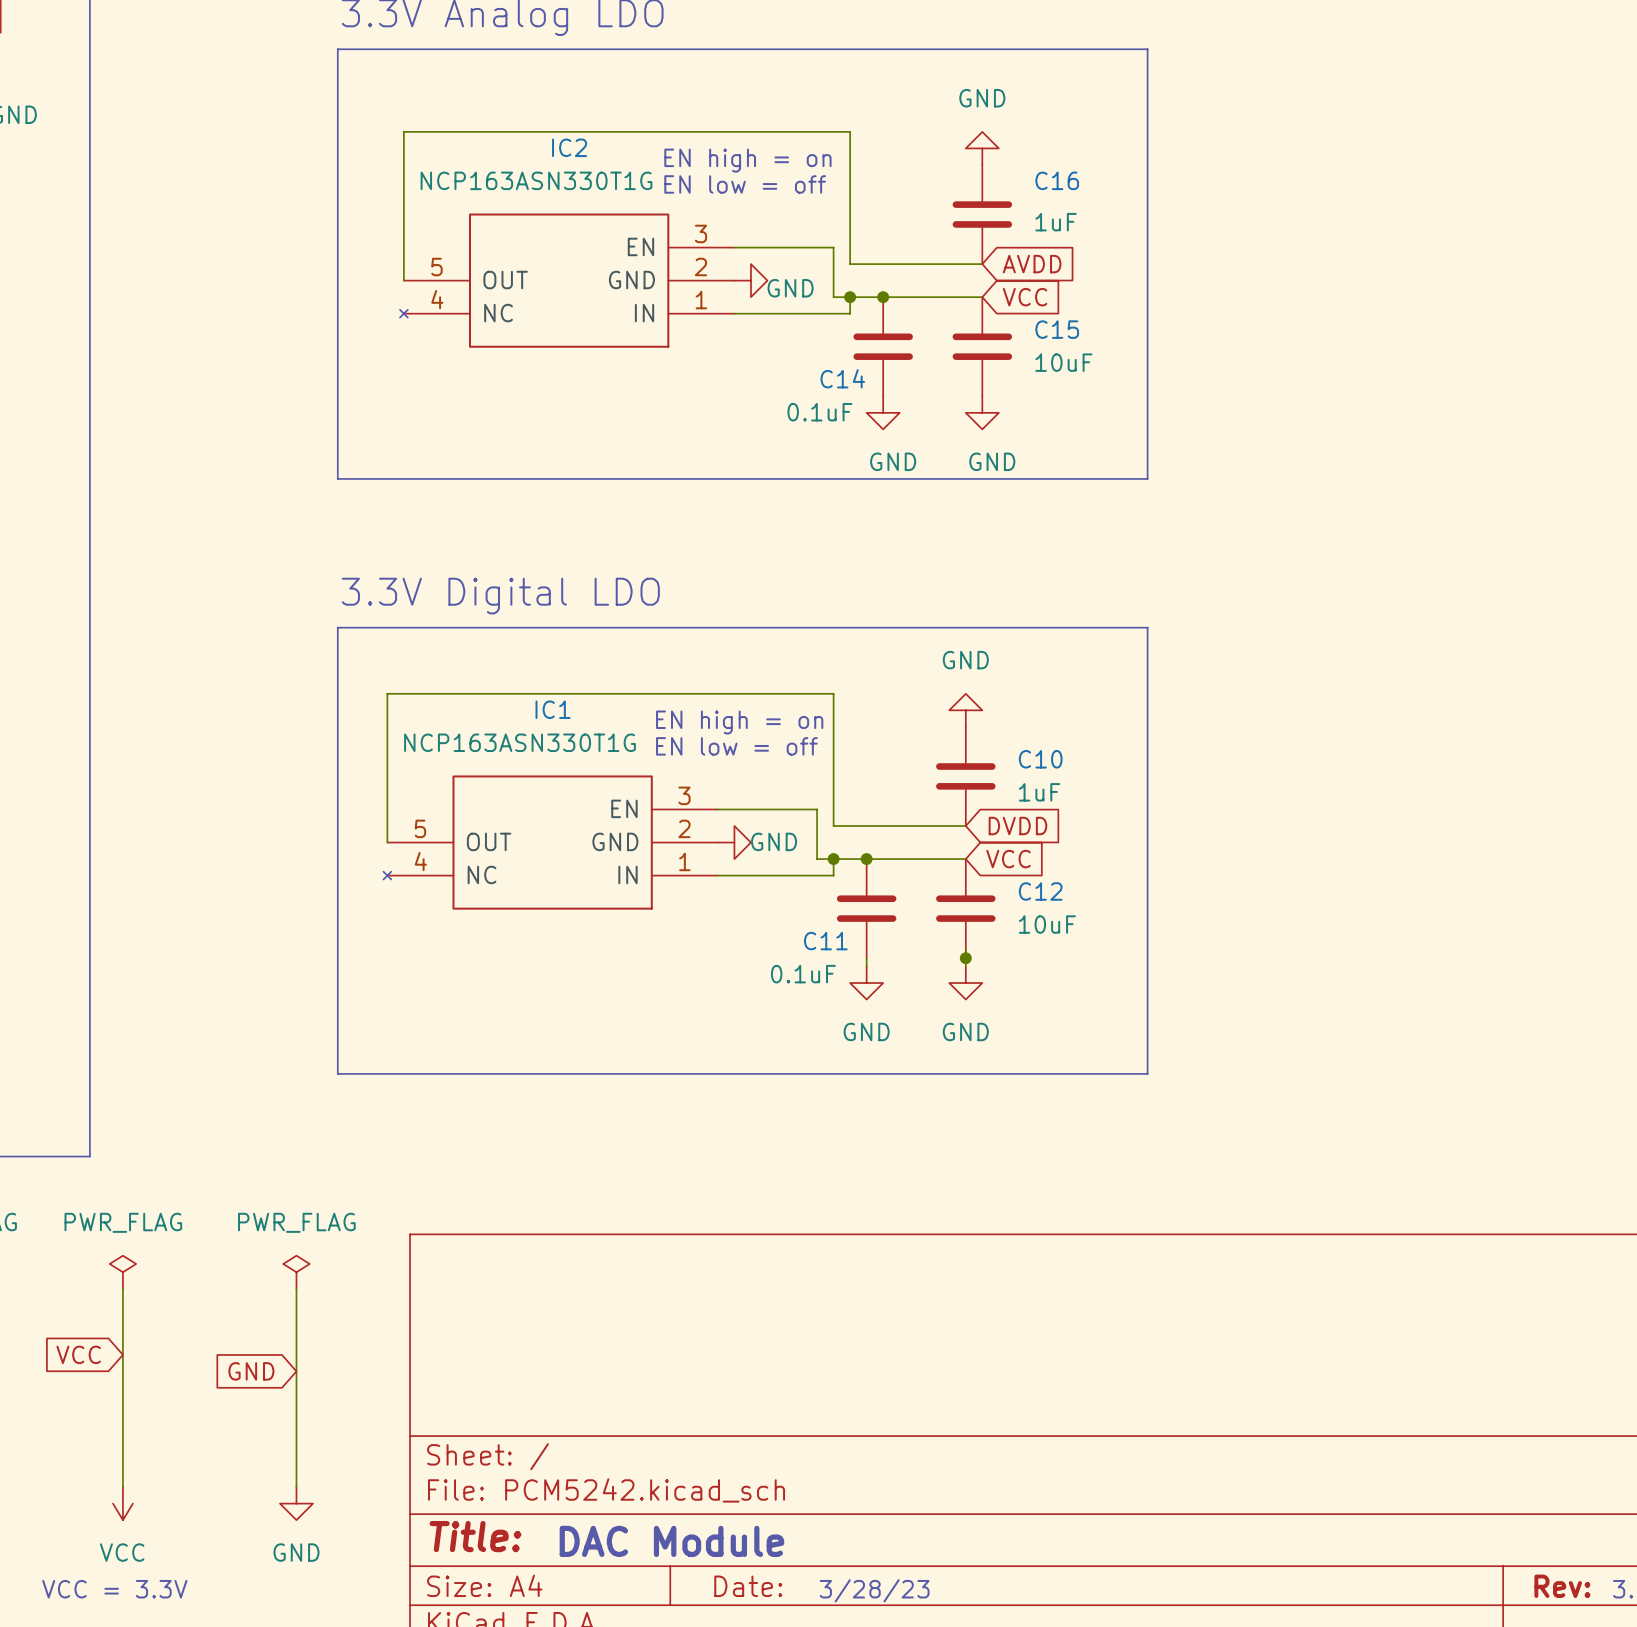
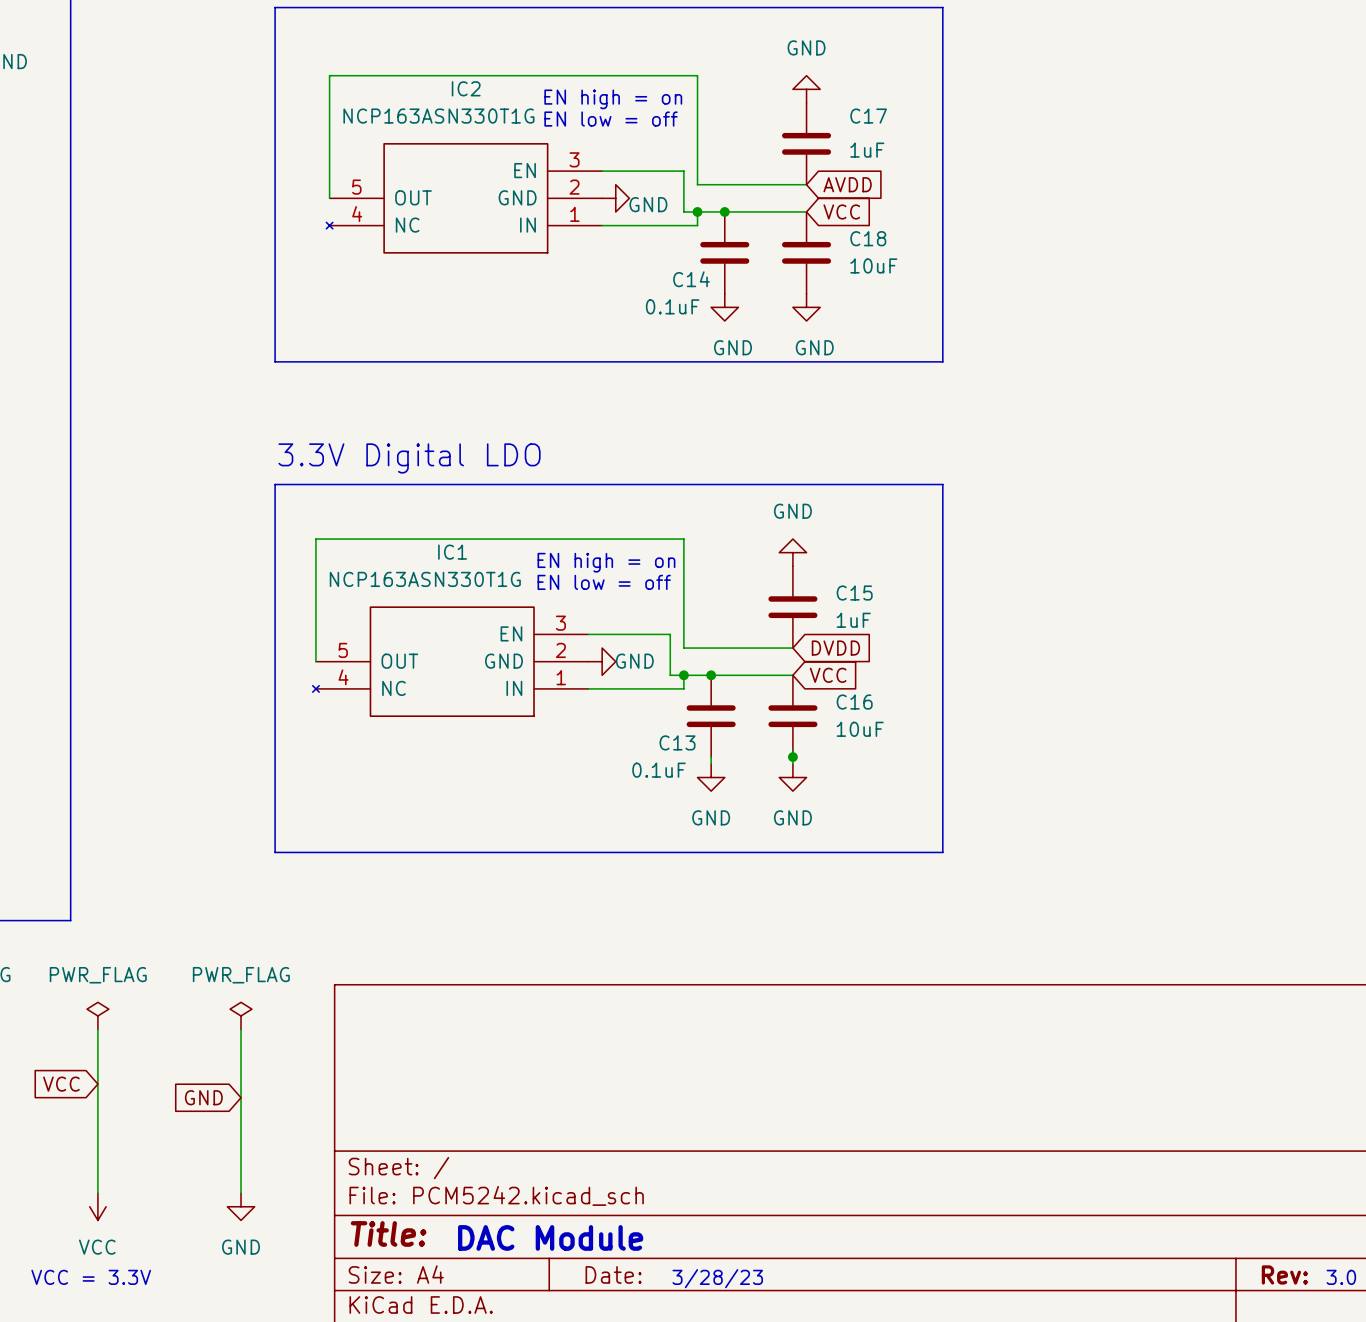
C16 name: C16 (1057, 180) -> C17 (868, 116)
C15 name: C15 (1057, 329) -> C18 (868, 238)
C10 name: C10 (1040, 759) -> C15 (854, 593)
C12 name: C12 (1040, 891) -> C16 (854, 702)
C11 name: C11 (825, 941) -> C13 (677, 742)

